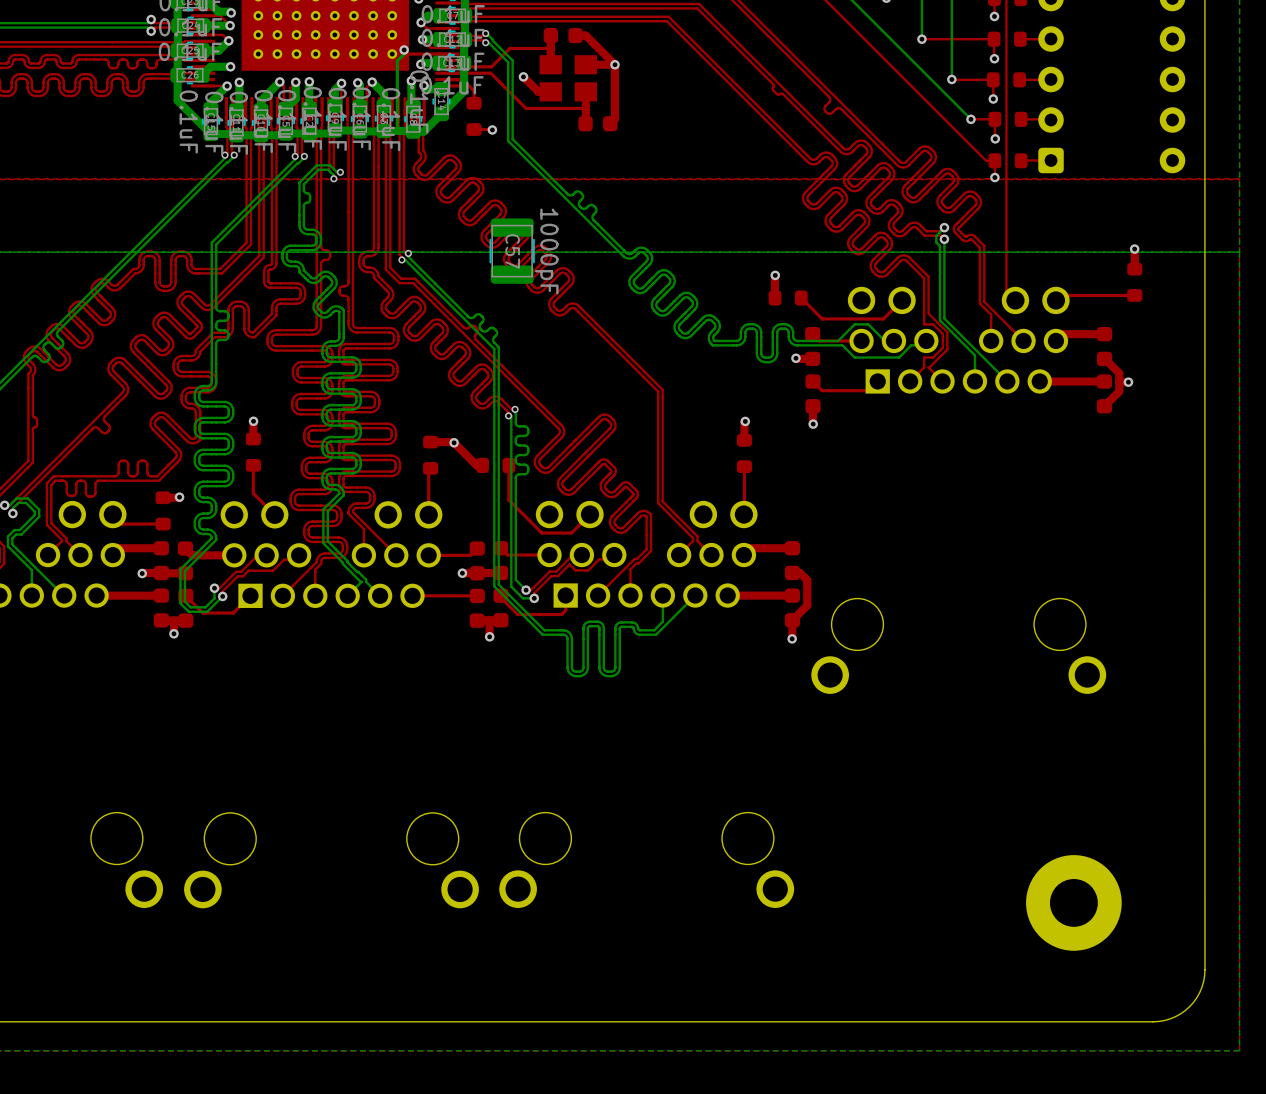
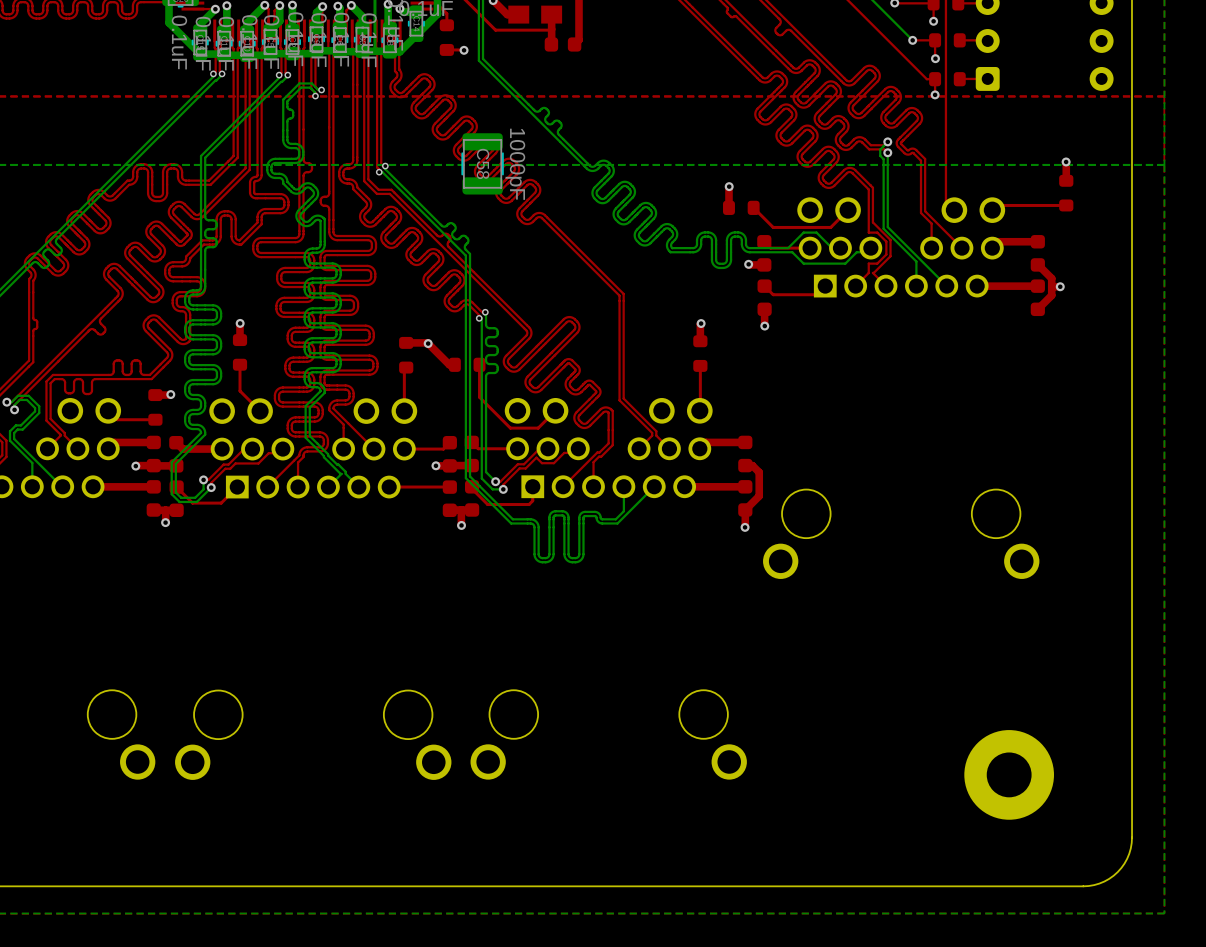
C57 name: C57 (512, 251) -> C58 (483, 163)

